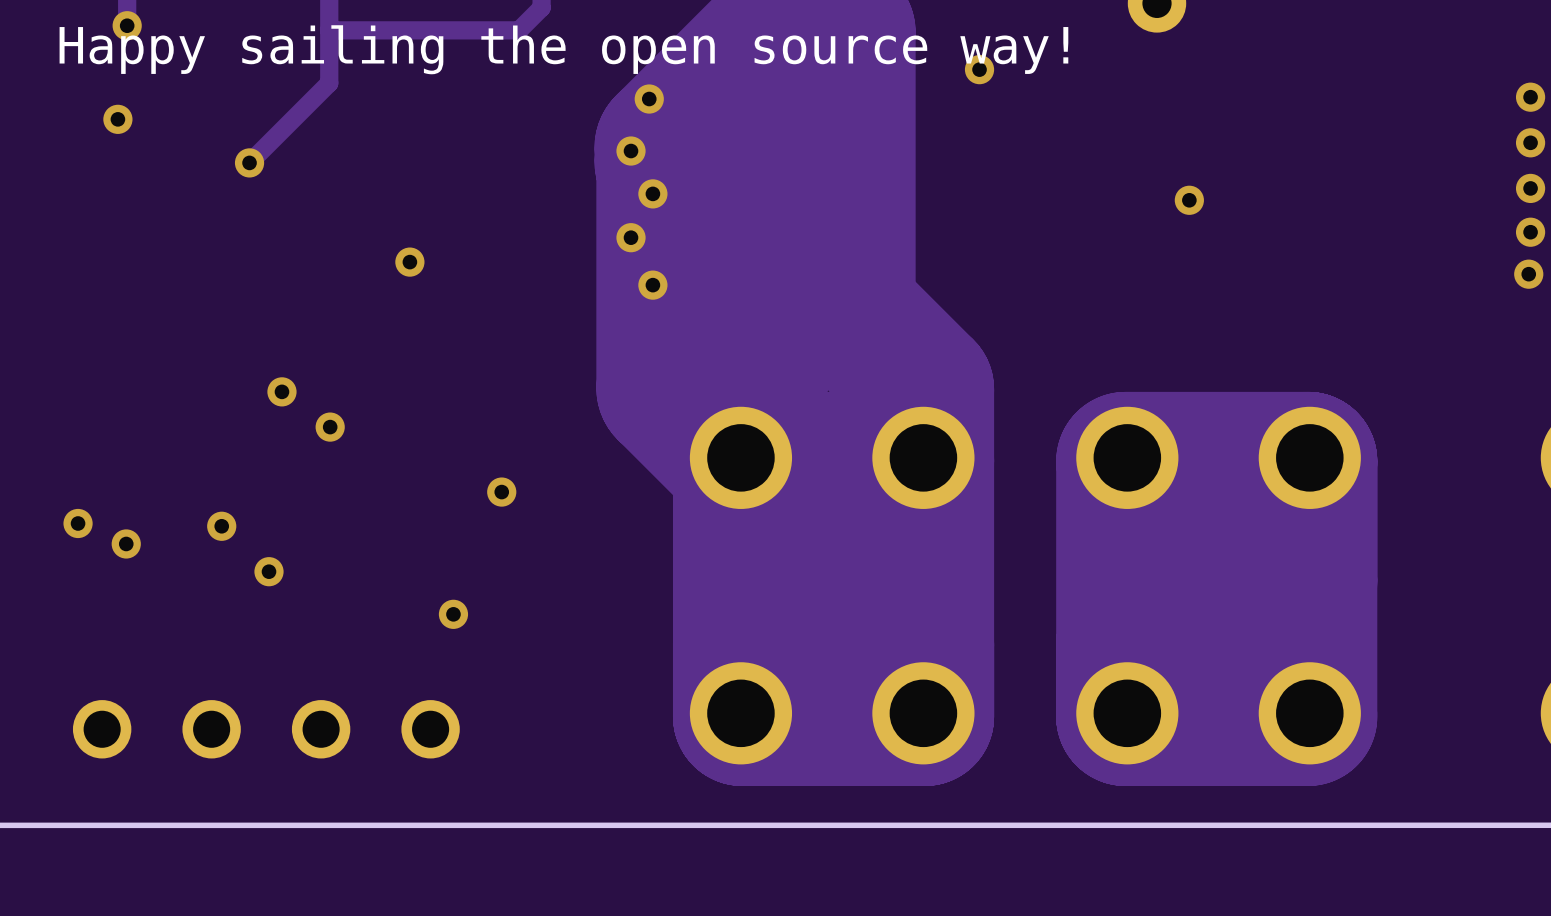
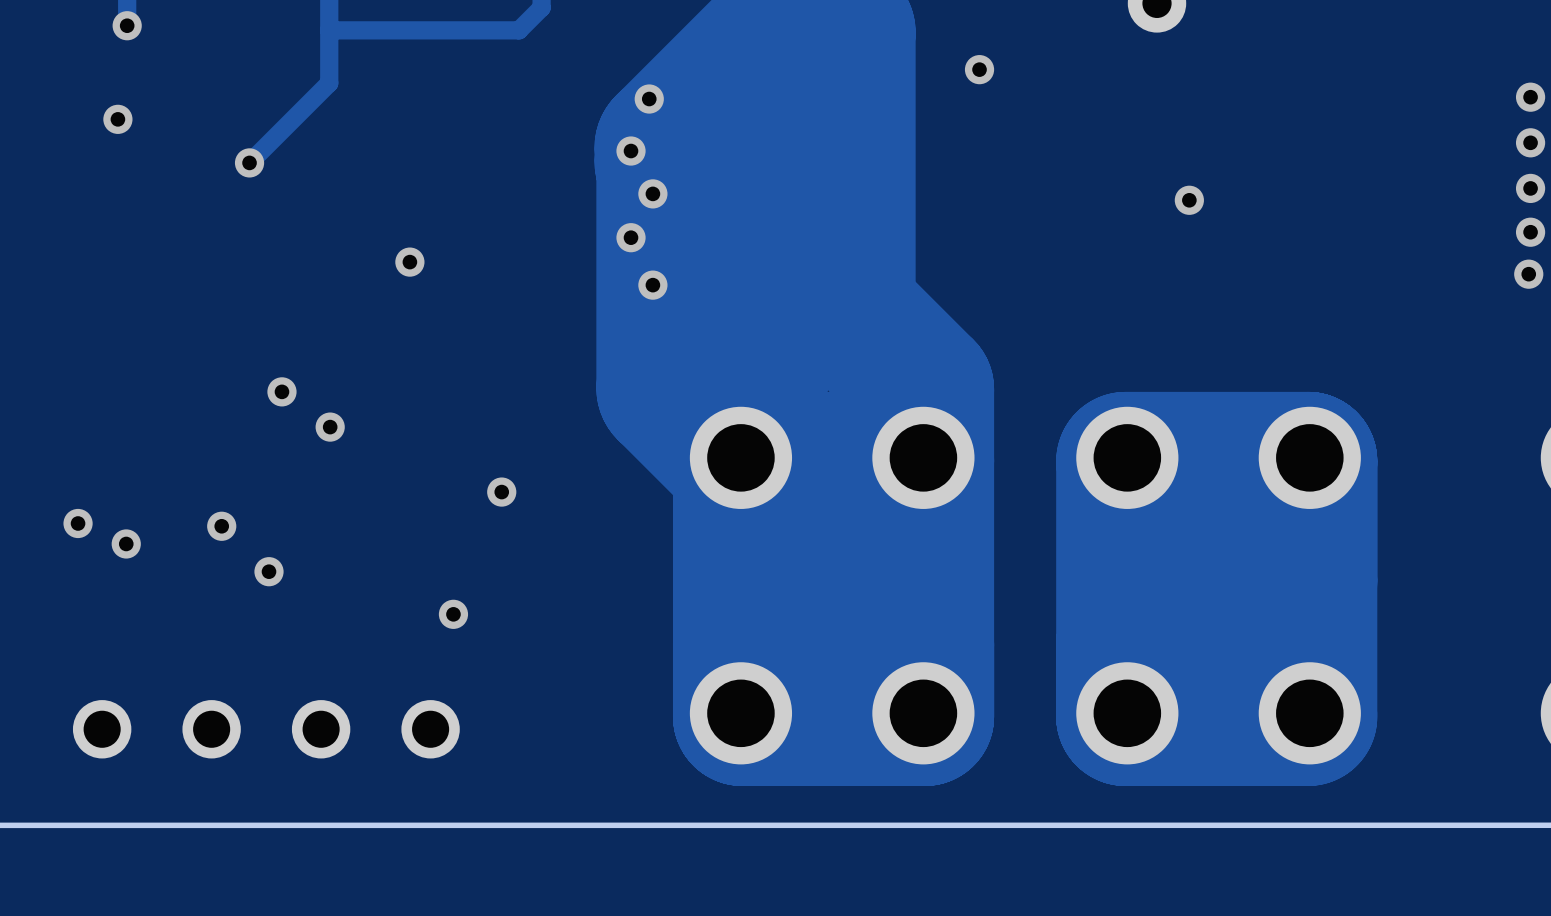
text: Happy sailing the open source way! (563, 49) -> none

